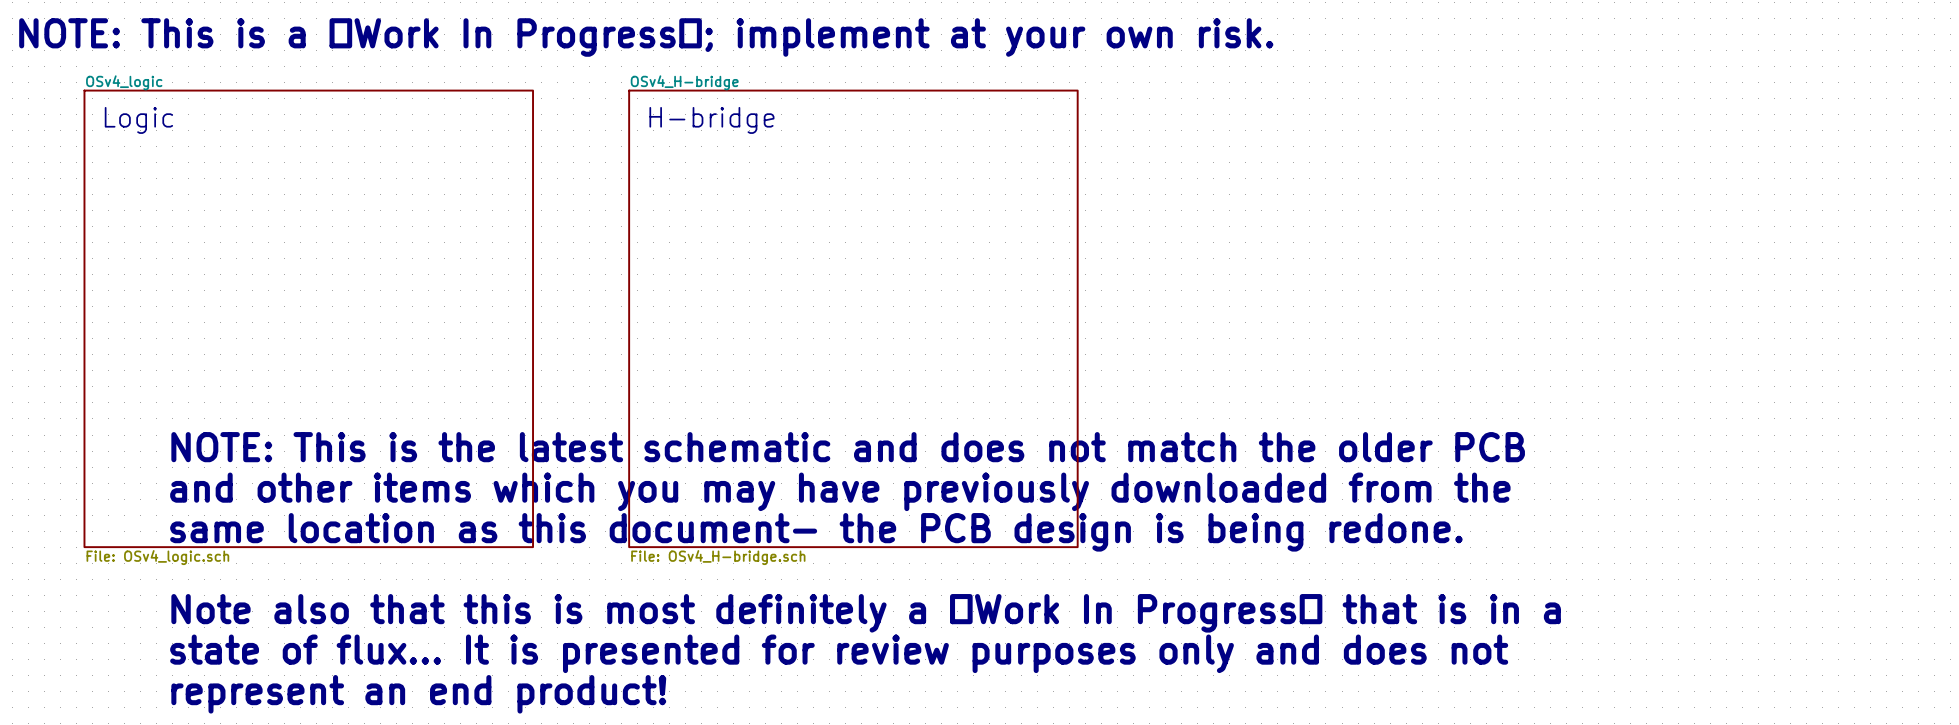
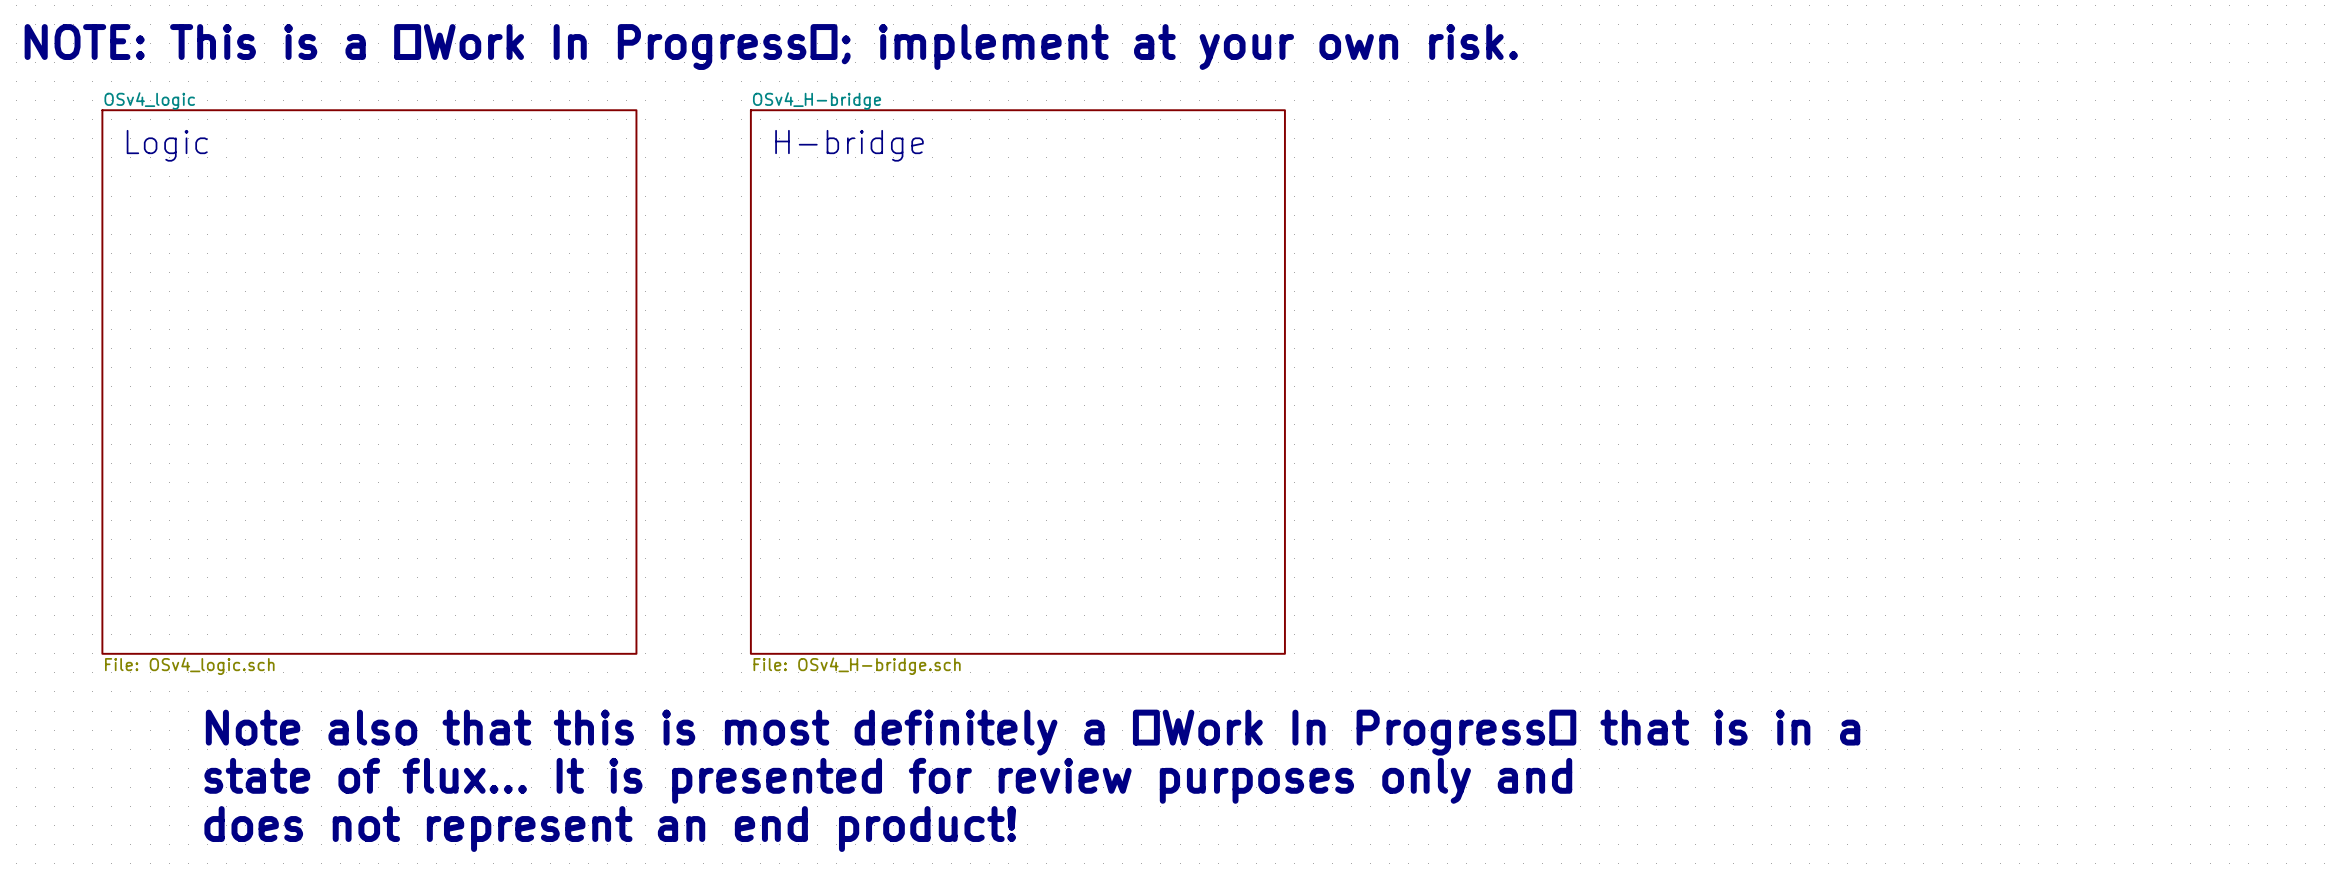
text: NOTE: This is the latest schematic and does not match the older PCB (848, 447) -> none
text: and other items which you may have previously downloaded from the (840, 491) -> none
text: same location as this document- the PCB design is being redone. (816, 532) -> none
text: state of flux... It is presented for review purposes only and does not (839, 653) -> state of flux... It is presented for review purposes only and (888, 780)
text: represent an end product! (418, 694) -> does not represent an end product! (610, 829)

